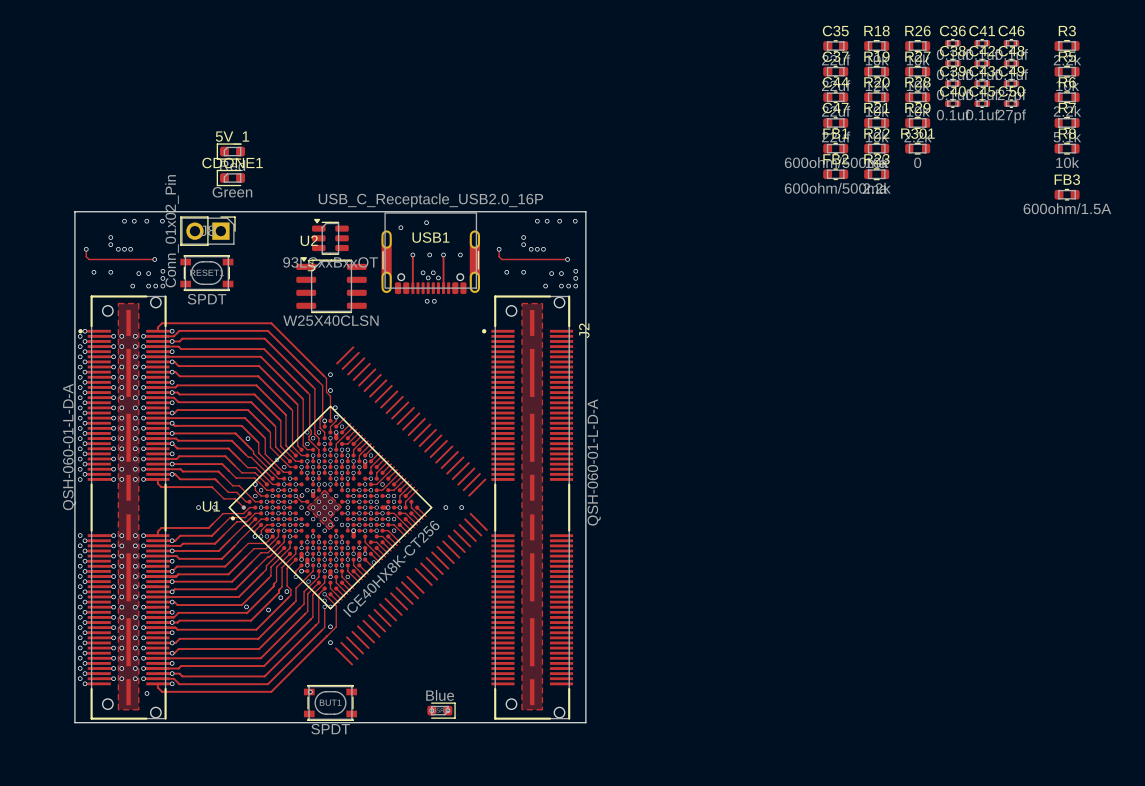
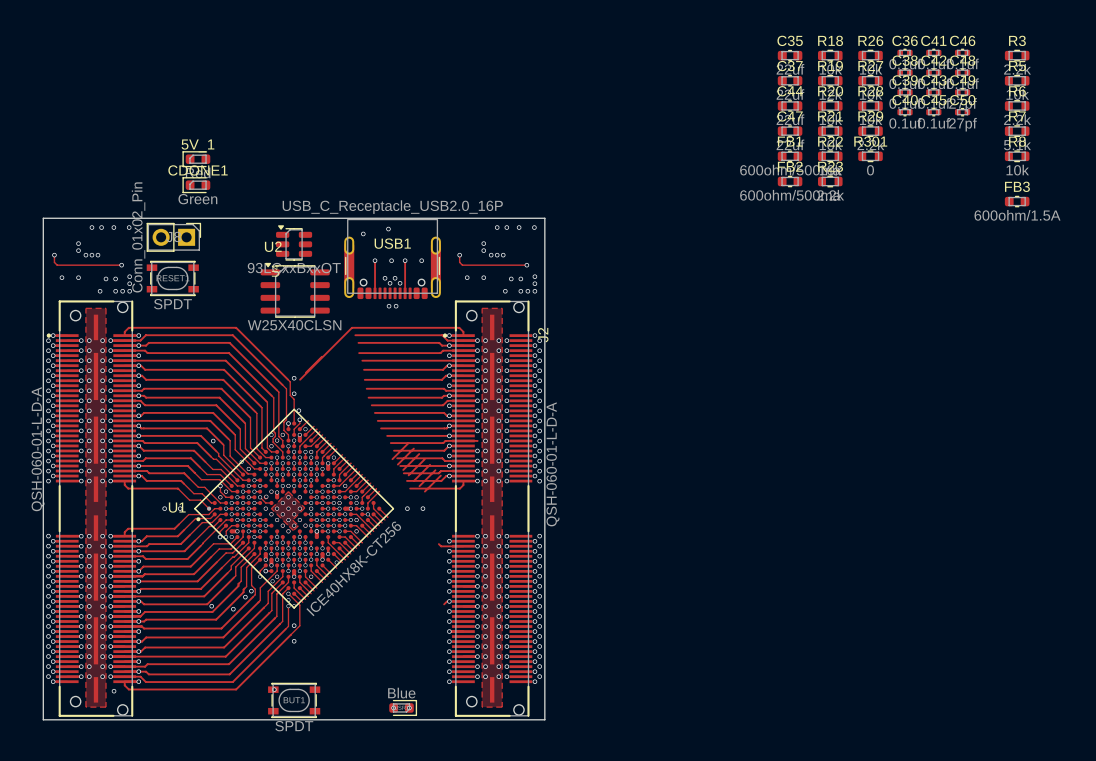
track: none -> (355, 335) (442, 335) (447, 340) (477, 340)
track: none -> (449, 335) (463, 335) (463, 331) (459, 327) (351, 327) (300, 379)
via: none -> (449, 335)
via: none -> (534, 335)
via: none -> (477, 340)
via: none -> (485, 340)
via: none -> (498, 340)
via: none -> (506, 340)
via: none -> (539, 340)
track: none -> (358, 342) (439, 342) (442, 345) (463, 345)
via: none -> (449, 345)
via: none -> (534, 345)
track: none -> (477, 350) (443, 350) (440, 353) (359, 353)
via: none -> (477, 350)
via: none -> (485, 350)
via: none -> (498, 350)
via: none -> (506, 350)
via: none -> (539, 350)
track: (353, 347) (337, 363) -> none
via: none -> (449, 355)
via: none -> (534, 355)
track: none -> (362, 360) (477, 360)
via: none -> (477, 360)
via: none -> (485, 360)
via: none -> (498, 360)
via: none -> (506, 360)
via: none -> (539, 360)
track: (364, 358) (348, 374) -> none
via: none -> (449, 365)
track: none -> (463, 365) (447, 365) (443, 369) (364, 369)
via: none -> (534, 365)
track: (369, 363) (353, 380) -> none
via: none -> (477, 370)
via: none -> (485, 370)
via: none -> (498, 370)
via: none -> (506, 370)
via: none -> (539, 370)
track: (375, 369) (359, 385) -> none
via: none -> (449, 375)
track: none -> (463, 375) (446, 375) (441, 379) (364, 379)
via: none -> (534, 375)
track: (380, 374) (364, 391) -> none
via: none -> (477, 380)
via: none -> (485, 380)
via: none -> (498, 380)
via: none -> (506, 380)
via: none -> (539, 380)
track: (386, 380) (370, 396) -> none
via: none -> (449, 385)
via: none -> (534, 385)
track: (391, 385) (375, 402) -> none
track: none -> (366, 388) (477, 390)
via: none -> (477, 390)
via: none -> (485, 390)
via: none -> (498, 390)
via: none -> (506, 390)
via: none -> (539, 390)
track: (397, 391) (381, 407) -> none
via: none -> (449, 395)
track: none -> (463, 395) (368, 397)
via: none -> (534, 395)
track: (402, 396) (386, 413) -> none
track: none -> (477, 400) (447, 400) (443, 405) (371, 405)
via: none -> (477, 400)
via: none -> (485, 400)
via: none -> (498, 400)
via: none -> (506, 400)
via: none -> (539, 400)
track: (408, 402) (392, 418) -> none
via: none -> (449, 405)
via: none -> (534, 405)
track: (413, 407) (397, 424) -> none
via: none -> (477, 410)
via: none -> (485, 410)
via: none -> (498, 410)
via: none -> (506, 410)
via: none -> (539, 410)
track: none -> (374, 412) (444, 412) (447, 415) (463, 415)
track: (419, 413) (403, 429) -> none
via: none -> (449, 415)
via: none -> (534, 415)
track: (424, 418) (408, 435) -> none
via: none -> (477, 420)
via: none -> (485, 420)
via: none -> (498, 420)
via: none -> (506, 420)
via: none -> (539, 420)
via: none -> (449, 425)
track: none -> (463, 425) (449, 425) (446, 428) (381, 428)
via: none -> (534, 425)
track: (430, 424) (414, 440) -> none
via: none -> (477, 430)
via: none -> (485, 430)
via: none -> (498, 430)
via: none -> (506, 430)
via: none -> (539, 430)
track: (435, 429) (419, 446) -> none
track: none -> (387, 435) (463, 435)
via: none -> (449, 435)
via: none -> (534, 435)
track: (441, 435) (425, 451) -> none
track: none -> (477, 440) (390, 443)
via: none -> (485, 440)
via: none -> (498, 440)
via: none -> (506, 440)
via: none -> (539, 441)
via: none -> (449, 445)
track: none -> (463, 445) (449, 445) (444, 450) (393, 450)
via: none -> (534, 445)
via: none -> (477, 450)
via: none -> (485, 450)
via: none -> (498, 450)
via: none -> (506, 450)
via: none -> (539, 451)
via: none -> (449, 455)
via: none -> (534, 455)
track: none -> (397, 458) (442, 458) (445, 461) (477, 460)
via: none -> (477, 460)
via: none -> (485, 460)
via: none -> (498, 460)
via: none -> (506, 460)
via: none -> (539, 461)
track: none -> (400, 466) (463, 466)
via: none -> (449, 466)
via: none -> (534, 466)
track: none -> (477, 471) (403, 473)
via: none -> (477, 471)
via: none -> (485, 471)
via: none -> (498, 471)
via: none -> (506, 471)
via: none -> (539, 471)
via: none -> (449, 476)
track: none -> (463, 476) (446, 476) (441, 480) (407, 480)
via: none -> (534, 476)
track: (485, 479) (469, 495) -> none
track: none -> (477, 481) (463, 481) (463, 485) (459, 488) (410, 488)
via: none -> (477, 481)
via: none -> (485, 481)
via: none -> (498, 481)
via: none -> (506, 481)
via: none -> (539, 481)
via: none -> (367, 514)
track: (470, 513) (486, 530) -> none
track: (465, 519) (481, 535) -> none
track: (459, 524) (475, 541) -> none
track: (454, 530) (470, 546) -> none
track: (448, 535) (464, 552) -> none
via: none -> (477, 536)
via: none -> (485, 536)
via: none -> (498, 536)
via: none -> (506, 536)
via: none -> (539, 536)
via: none -> (449, 541)
via: none -> (534, 541)
track: (443, 541) (459, 557) -> none
track: none -> (438, 544) (441, 546) (463, 546)
via: none -> (477, 546)
via: none -> (485, 546)
via: none -> (498, 546)
via: none -> (506, 546)
via: none -> (539, 546)
track: (437, 546) (453, 563) -> none
via: none -> (449, 551)
via: none -> (534, 551)
track: (432, 552) (448, 568) -> none
via: none -> (477, 556)
via: none -> (485, 556)
via: none -> (498, 556)
via: none -> (506, 556)
via: none -> (539, 556)
track: (426, 557) (442, 574) -> none
via: none -> (449, 561)
via: none -> (534, 561)
track: (421, 563) (437, 579) -> none
via: none -> (477, 566)
via: none -> (485, 566)
via: none -> (498, 566)
via: none -> (506, 566)
via: none -> (539, 566)
track: (415, 568) (431, 585) -> none
via: none -> (449, 571)
via: none -> (534, 571)
track: (407, 576) (423, 592) -> none
via: none -> (477, 576)
via: none -> (485, 576)
via: none -> (498, 576)
via: none -> (506, 576)
via: none -> (539, 576)
via: none -> (449, 581)
via: none -> (534, 581)
track: (401, 582) (418, 598) -> none
via: none -> (477, 586)
via: none -> (485, 586)
via: none -> (498, 586)
via: none -> (506, 586)
via: none -> (539, 586)
track: (396, 587) (412, 603) -> none
via: none -> (449, 591)
via: none -> (534, 591)
track: (390, 593) (407, 609) -> none
via: none -> (477, 596)
via: none -> (485, 596)
via: none -> (498, 596)
via: none -> (506, 596)
via: none -> (539, 596)
track: (385, 598) (401, 614) -> none
track: none -> (447, 601) (444, 604)
via: none -> (449, 601)
via: none -> (534, 601)
track: (379, 604) (396, 620) -> none
via: none -> (477, 606)
via: none -> (485, 606)
via: none -> (498, 606)
via: none -> (506, 606)
via: none -> (539, 606)
track: (374, 609) (390, 626) -> none
via: none -> (449, 611)
via: none -> (534, 611)
track: (368, 615) (385, 631) -> none
via: none -> (477, 616)
via: none -> (485, 616)
via: none -> (498, 616)
via: none -> (506, 616)
via: none -> (539, 616)
track: (363, 620) (379, 637) -> none
via: none -> (449, 621)
via: none -> (534, 621)
track: (357, 626) (374, 642) -> none
via: none -> (477, 626)
via: none -> (485, 626)
via: none -> (498, 626)
via: none -> (506, 626)
via: none -> (539, 626)
track: (352, 631) (368, 648) -> none
via: none -> (449, 631)
via: none -> (534, 631)
track: (346, 637) (363, 653) -> none
via: none -> (477, 636)
via: none -> (485, 636)
via: none -> (498, 636)
via: none -> (506, 636)
via: none -> (539, 636)
track: (341, 642) (357, 659) -> none
via: none -> (449, 641)
via: none -> (534, 641)
via: none -> (539, 646)
track: (335, 648) (352, 664) -> none
via: none -> (477, 646)
via: none -> (485, 646)
via: none -> (498, 646)
via: none -> (506, 646)
via: none -> (449, 651)
via: none -> (534, 651)
via: none -> (477, 656)
via: none -> (485, 656)
via: none -> (498, 656)
via: none -> (506, 656)
via: none -> (539, 656)
via: none -> (449, 661)
via: none -> (534, 661)
via: none -> (477, 666)
via: none -> (485, 666)
via: none -> (498, 666)
via: none -> (506, 666)
via: none -> (539, 666)
via: none -> (449, 671)
via: none -> (534, 671)
via: none -> (477, 676)
via: none -> (485, 676)
via: none -> (498, 676)
via: none -> (506, 676)
via: none -> (539, 676)
via: none -> (449, 681)
via: none -> (534, 681)

